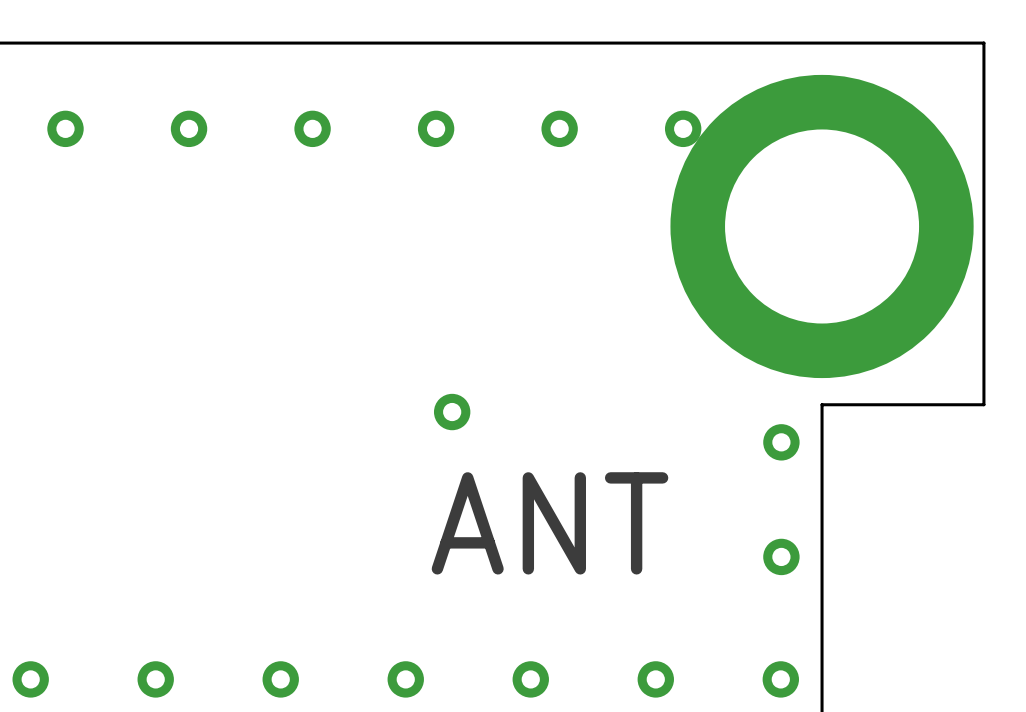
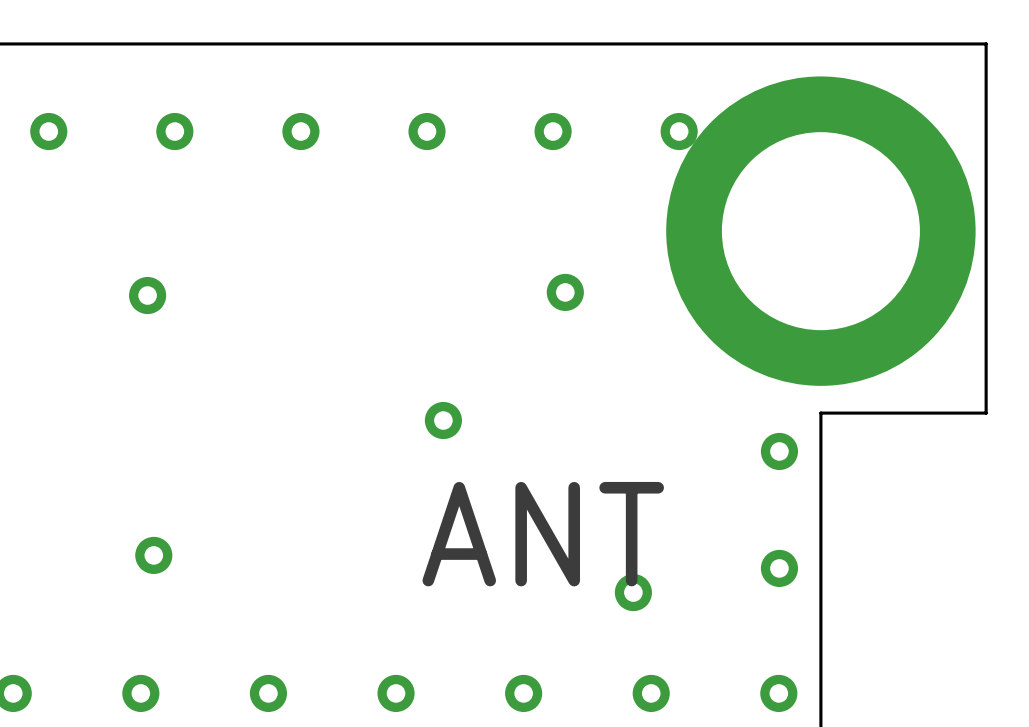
via: none -> (565, 292)
via: none -> (147, 295)
via: none -> (153, 555)
via: none -> (633, 592)

